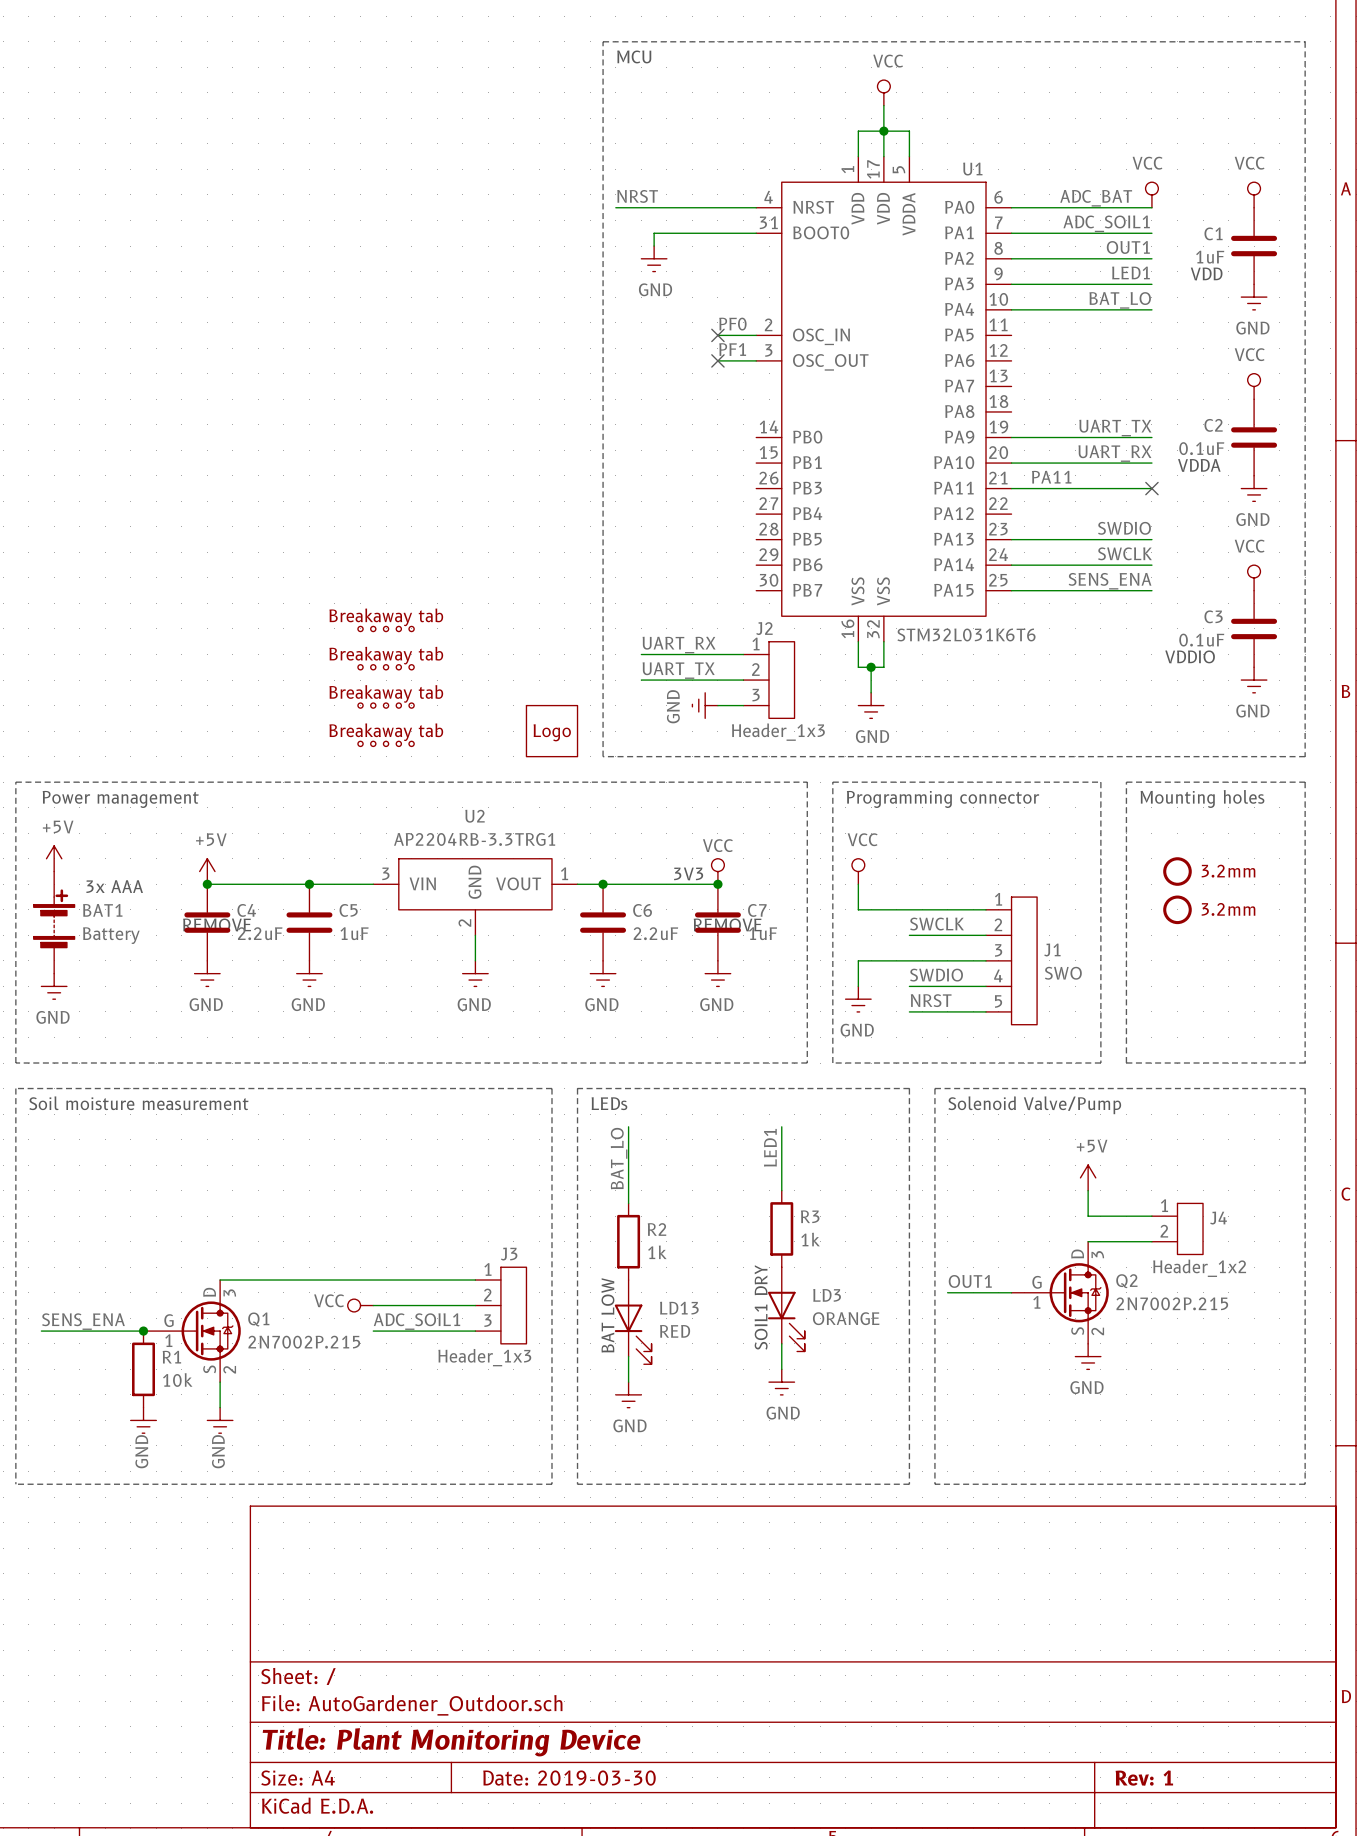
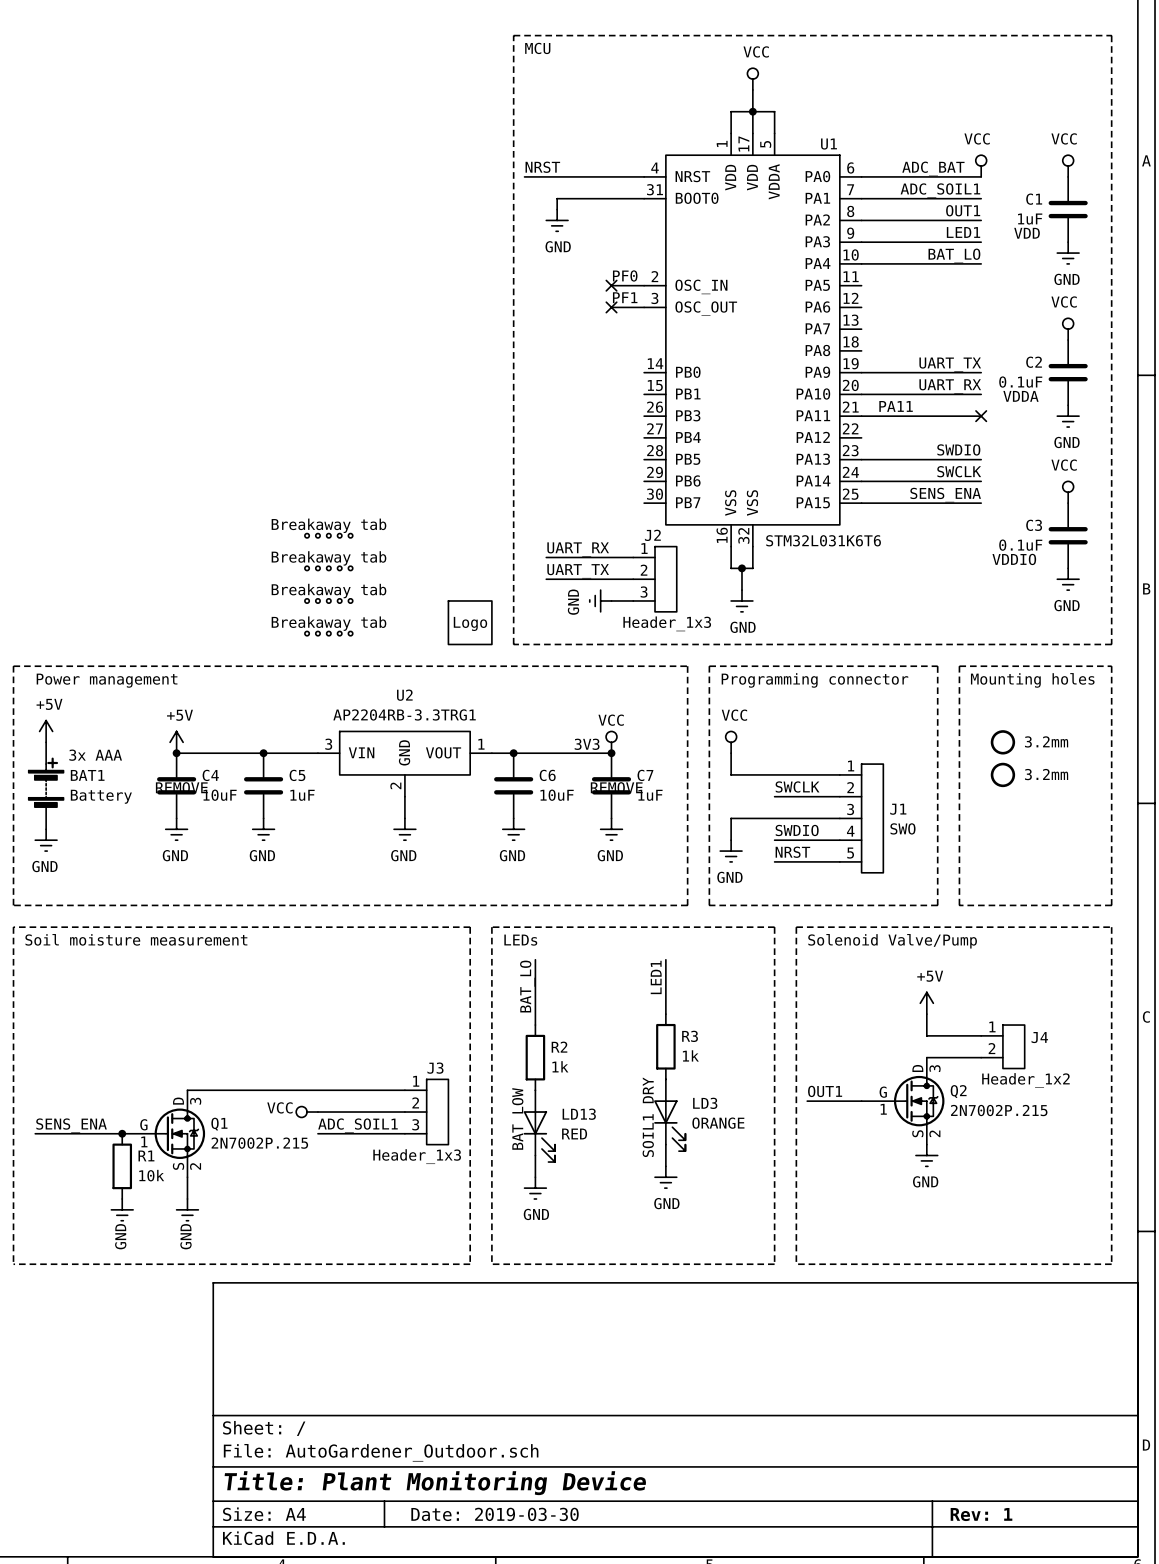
C4 value: 2.2uF (260, 933) -> 10uF (220, 795)
C6 value: 2.2uF (655, 933) -> 10uF (557, 795)

